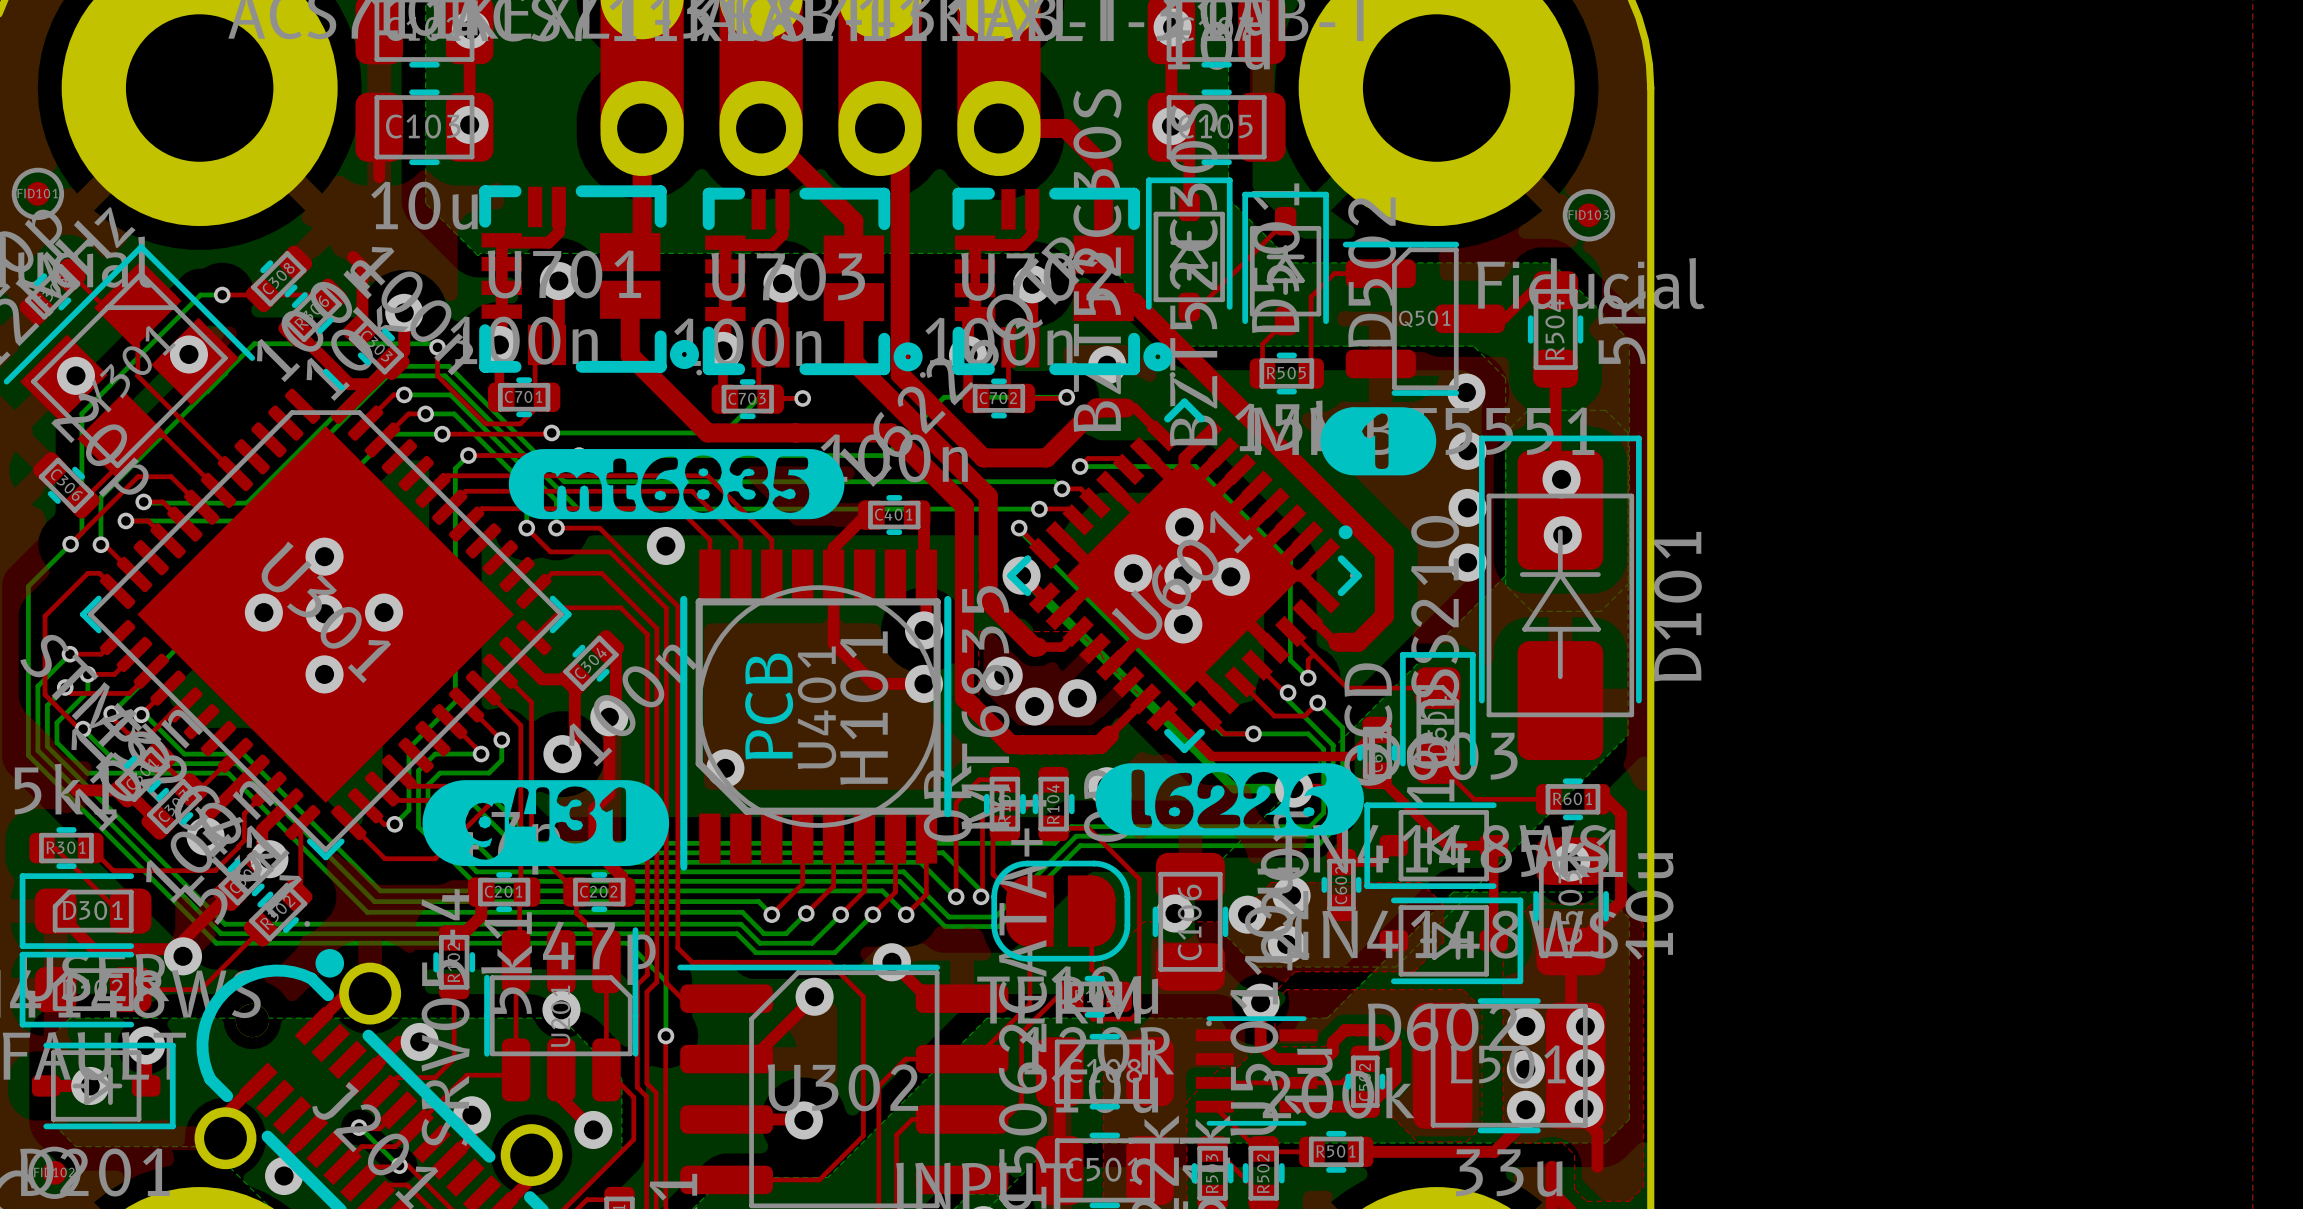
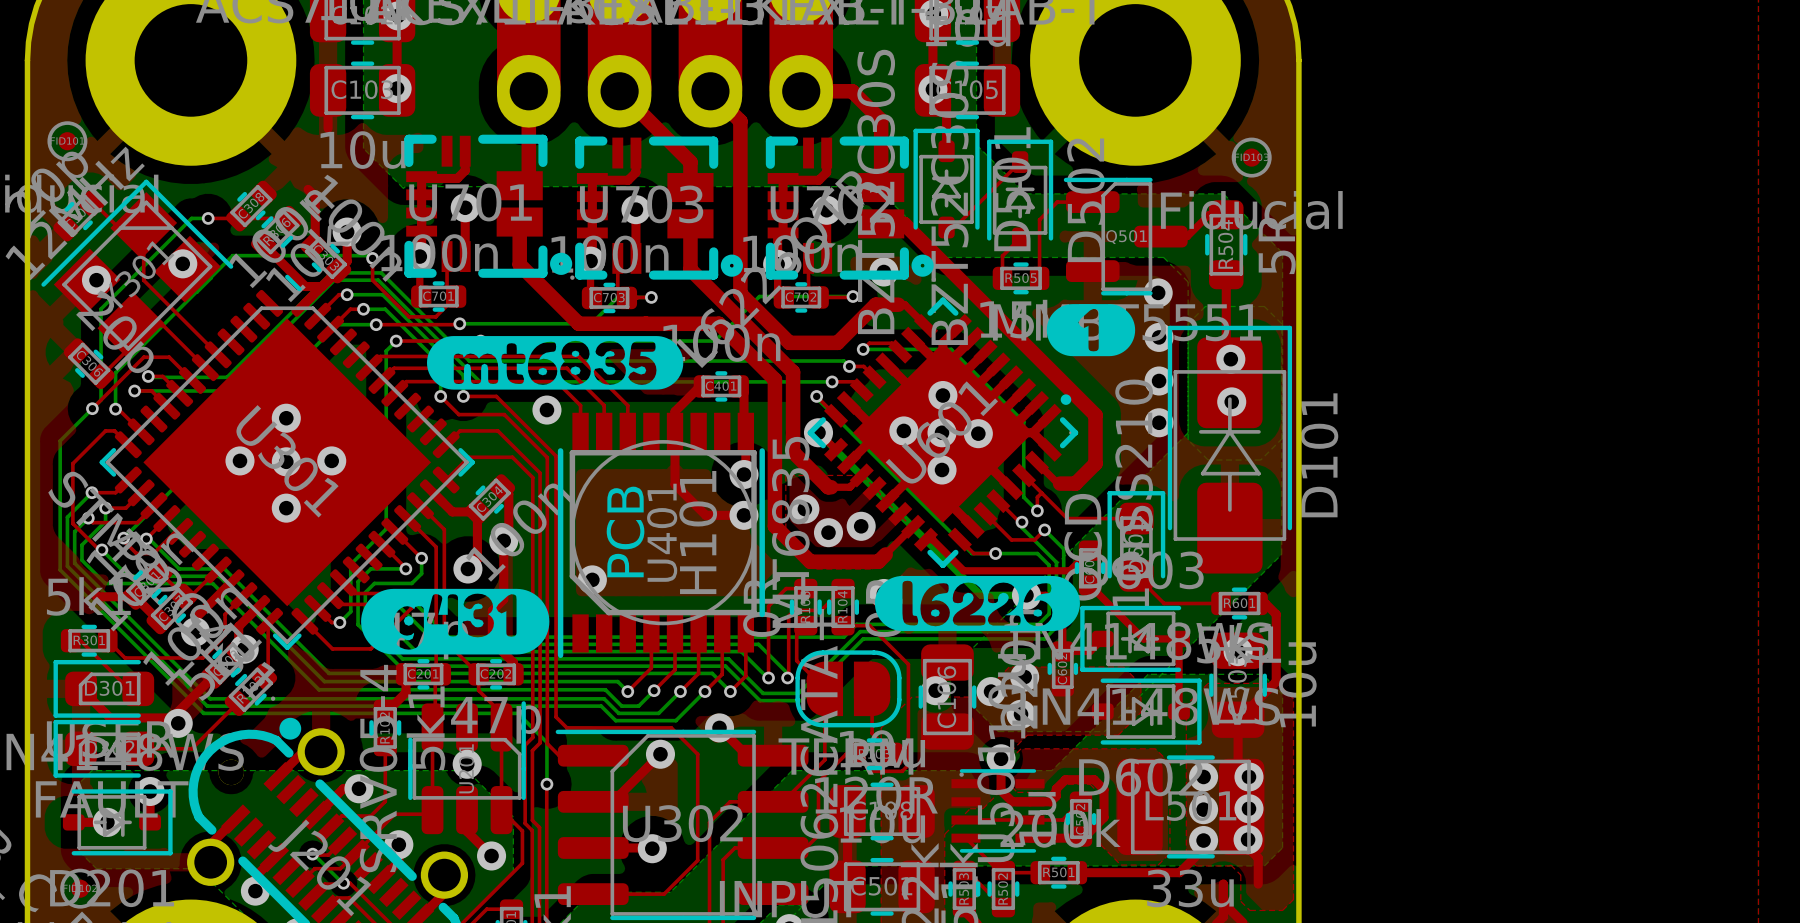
top track: (900, 148) (900, 374) (919, 393) -> (725, 106) (740, 121) (740, 293)

